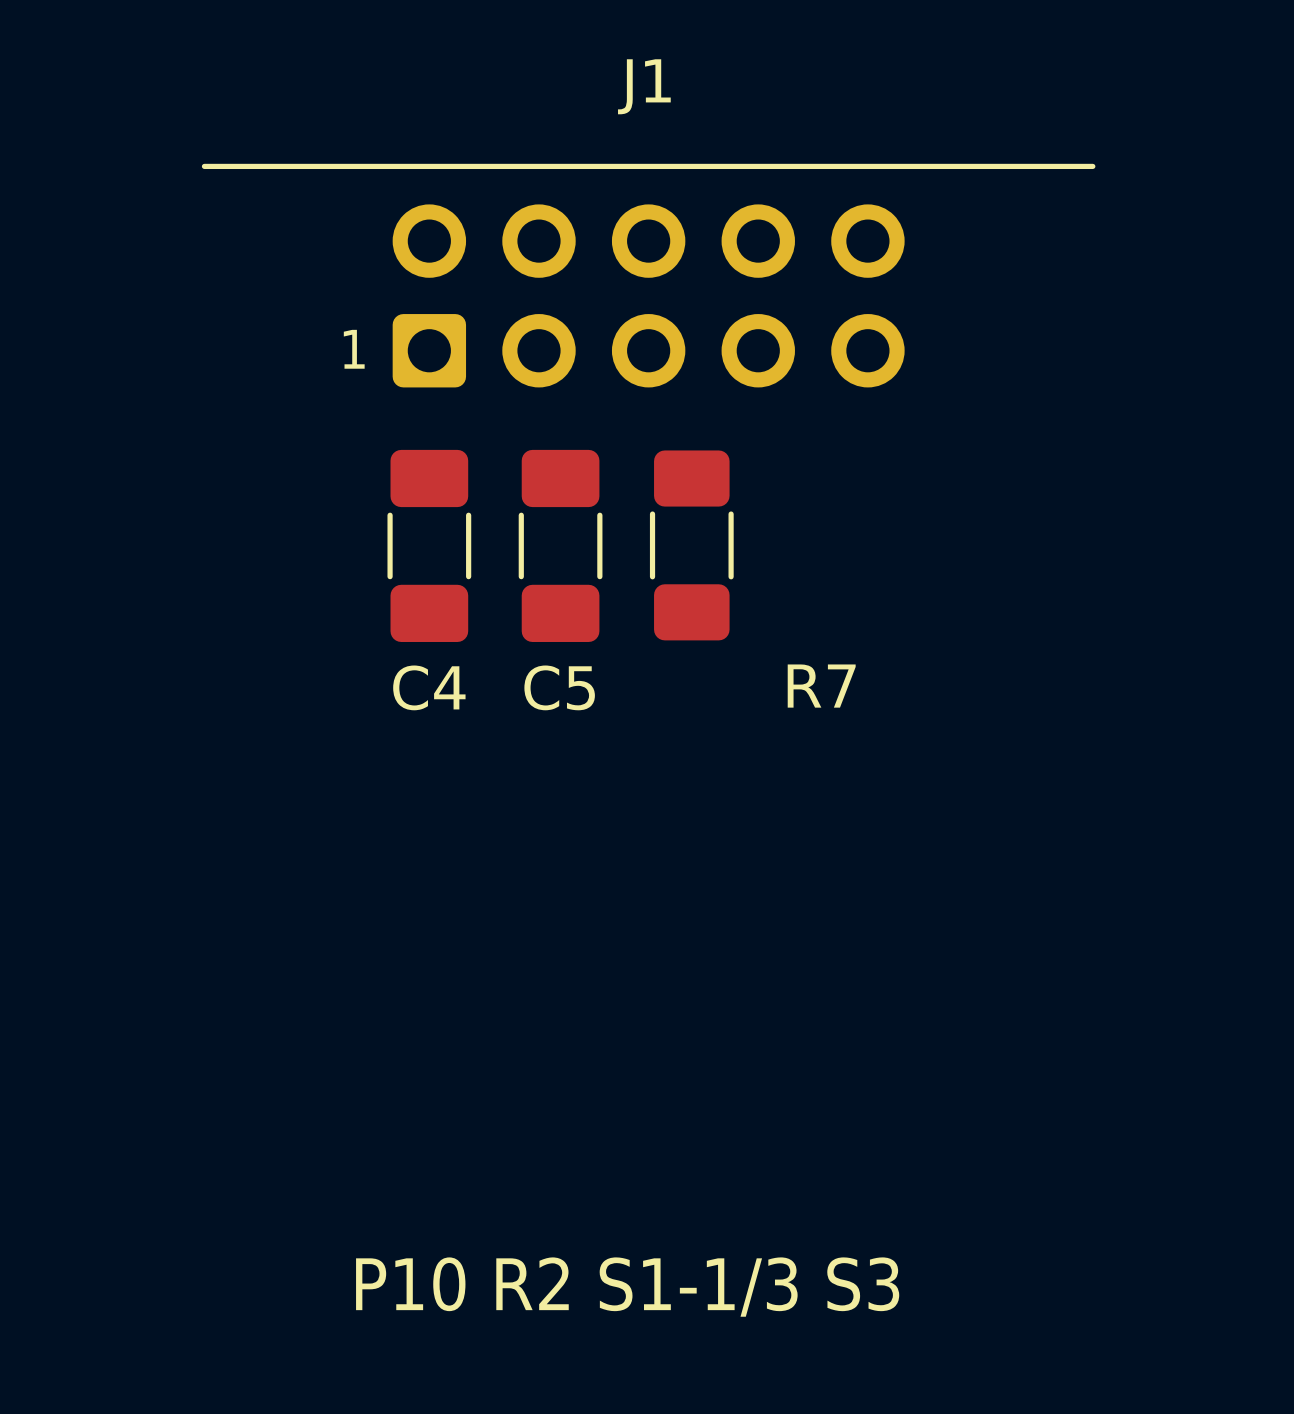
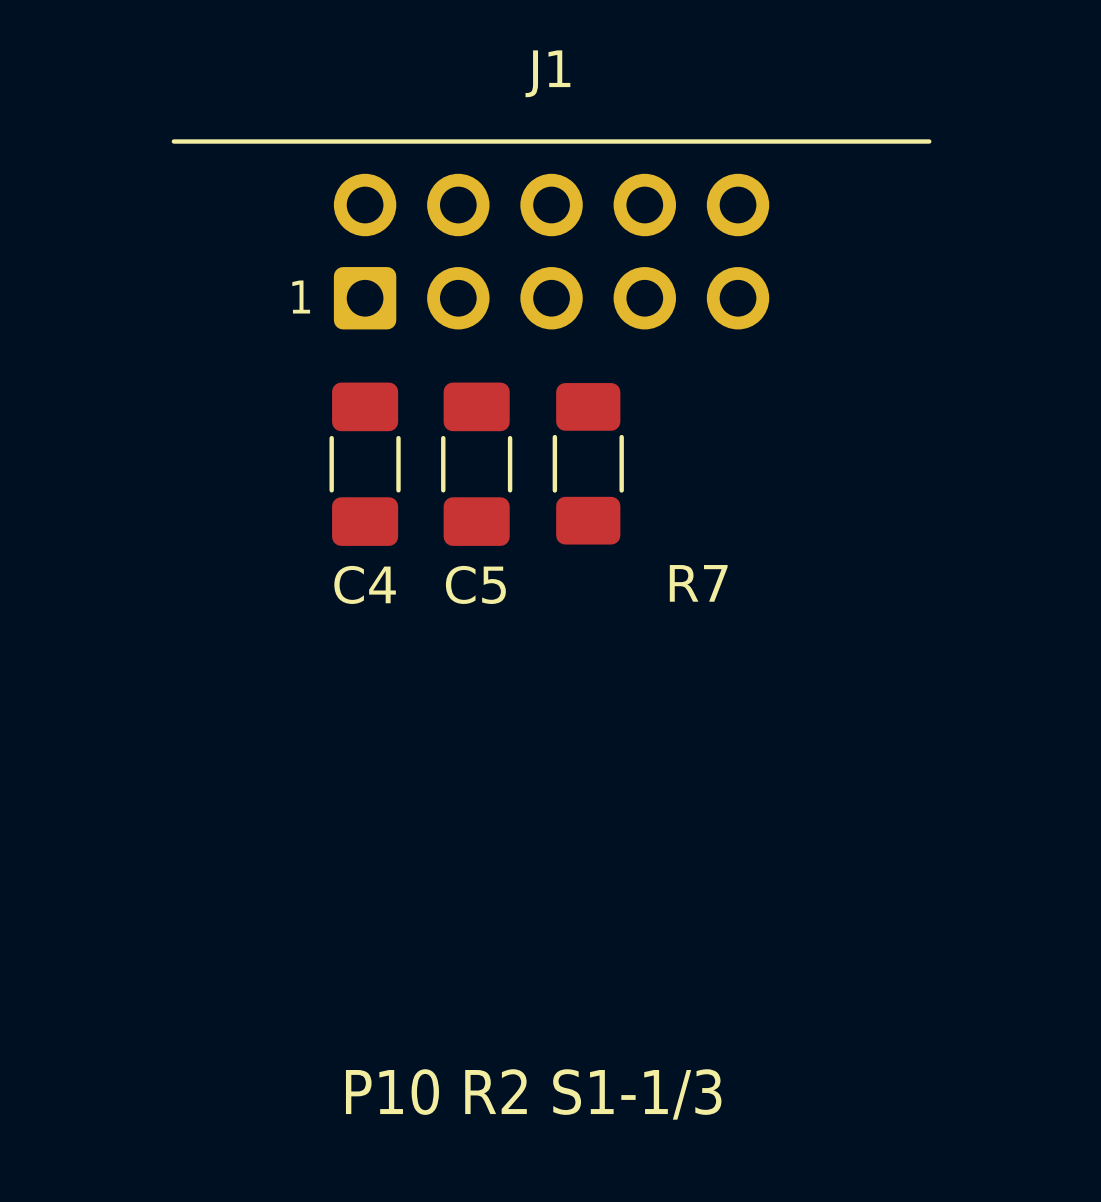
text: P10 R2 S1-1/3 S3 (627, 1287) -> P10 R2 S1-1/3 (533, 1094)

